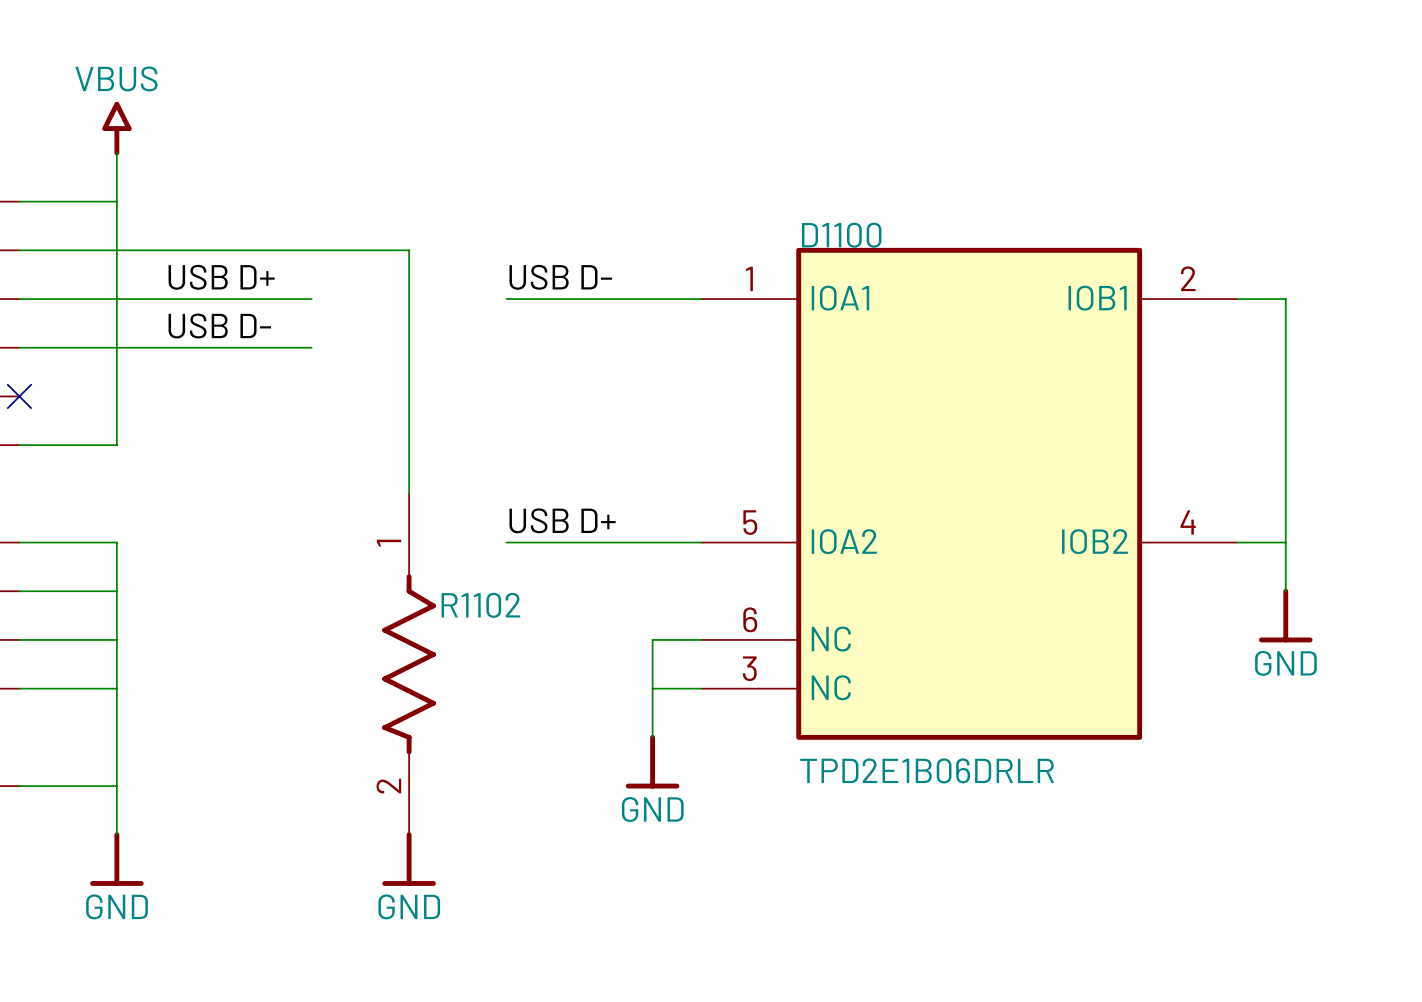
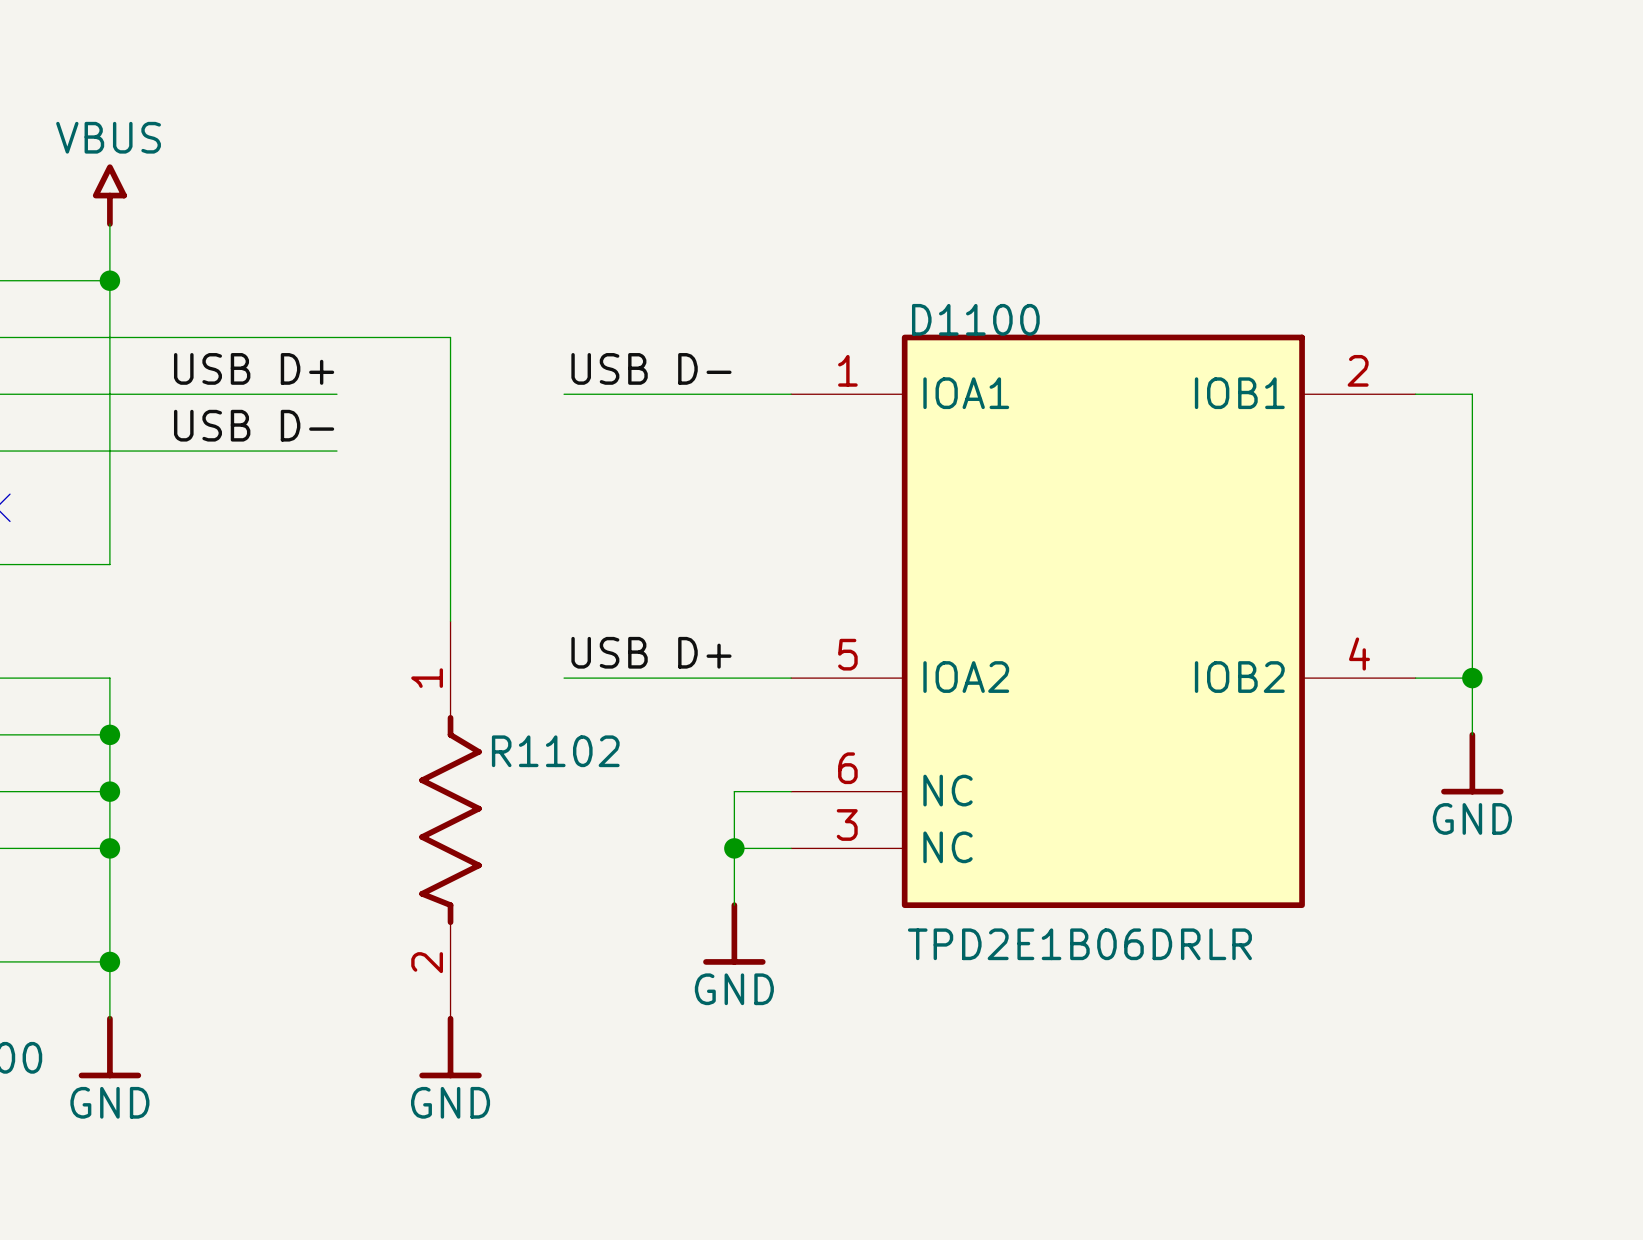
junction: none -> (109, 280)
junction: none -> (1472, 678)
junction: none -> (109, 734)
junction: none -> (109, 791)
junction: none -> (109, 848)
junction: none -> (734, 848)
junction: none -> (109, 961)

